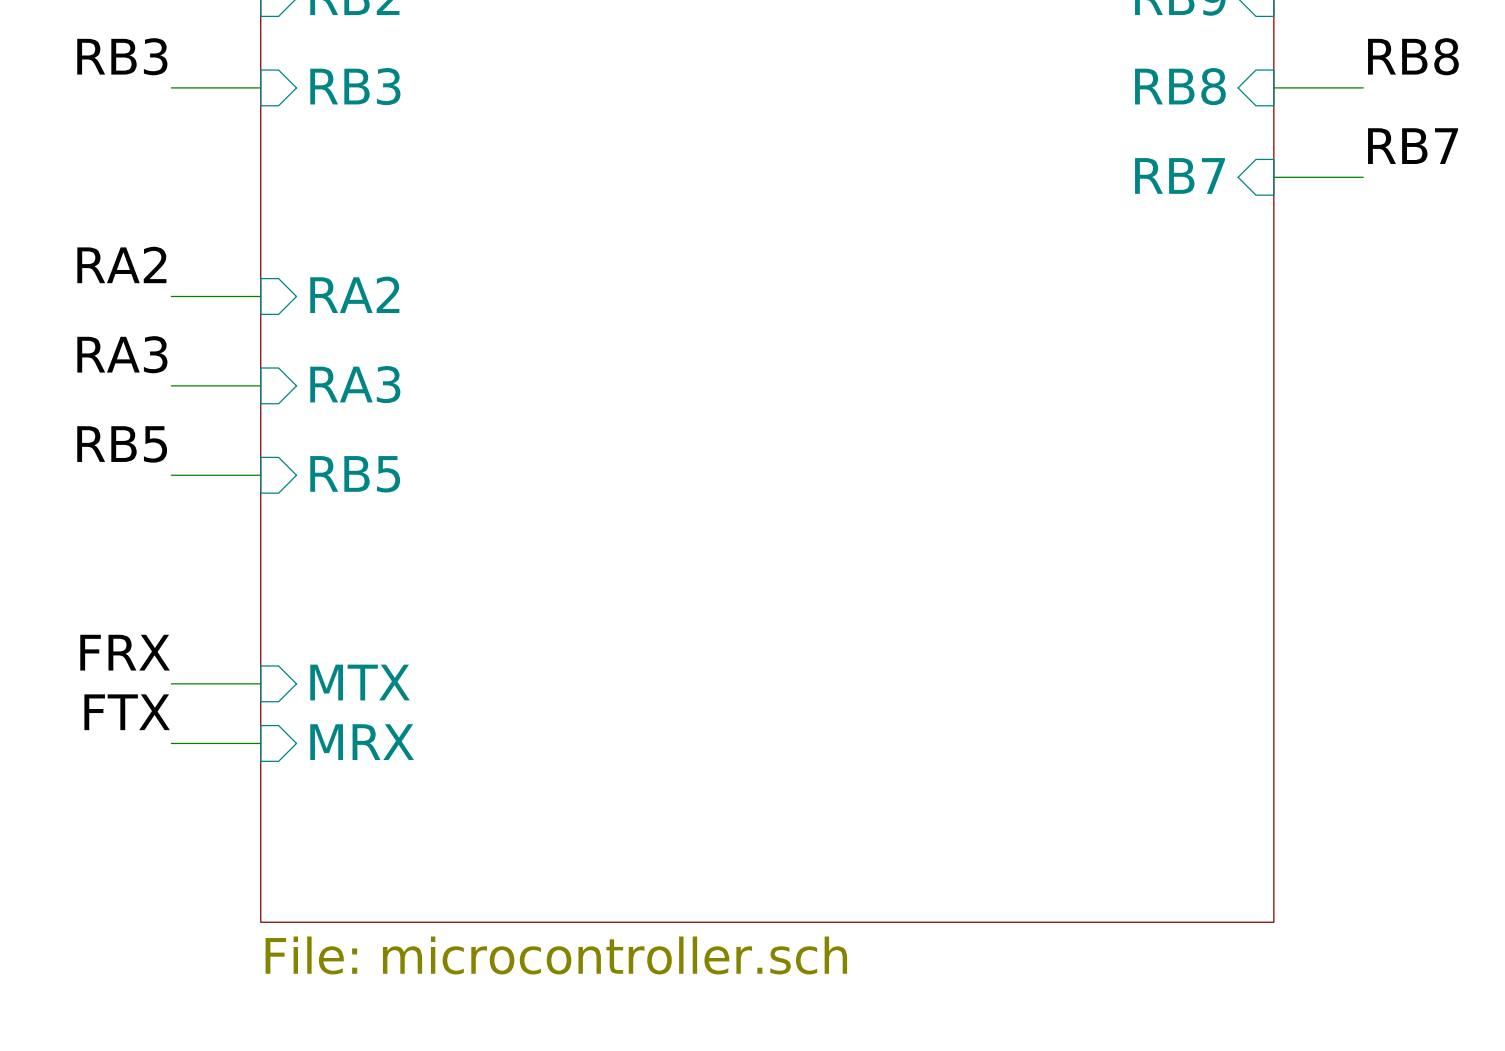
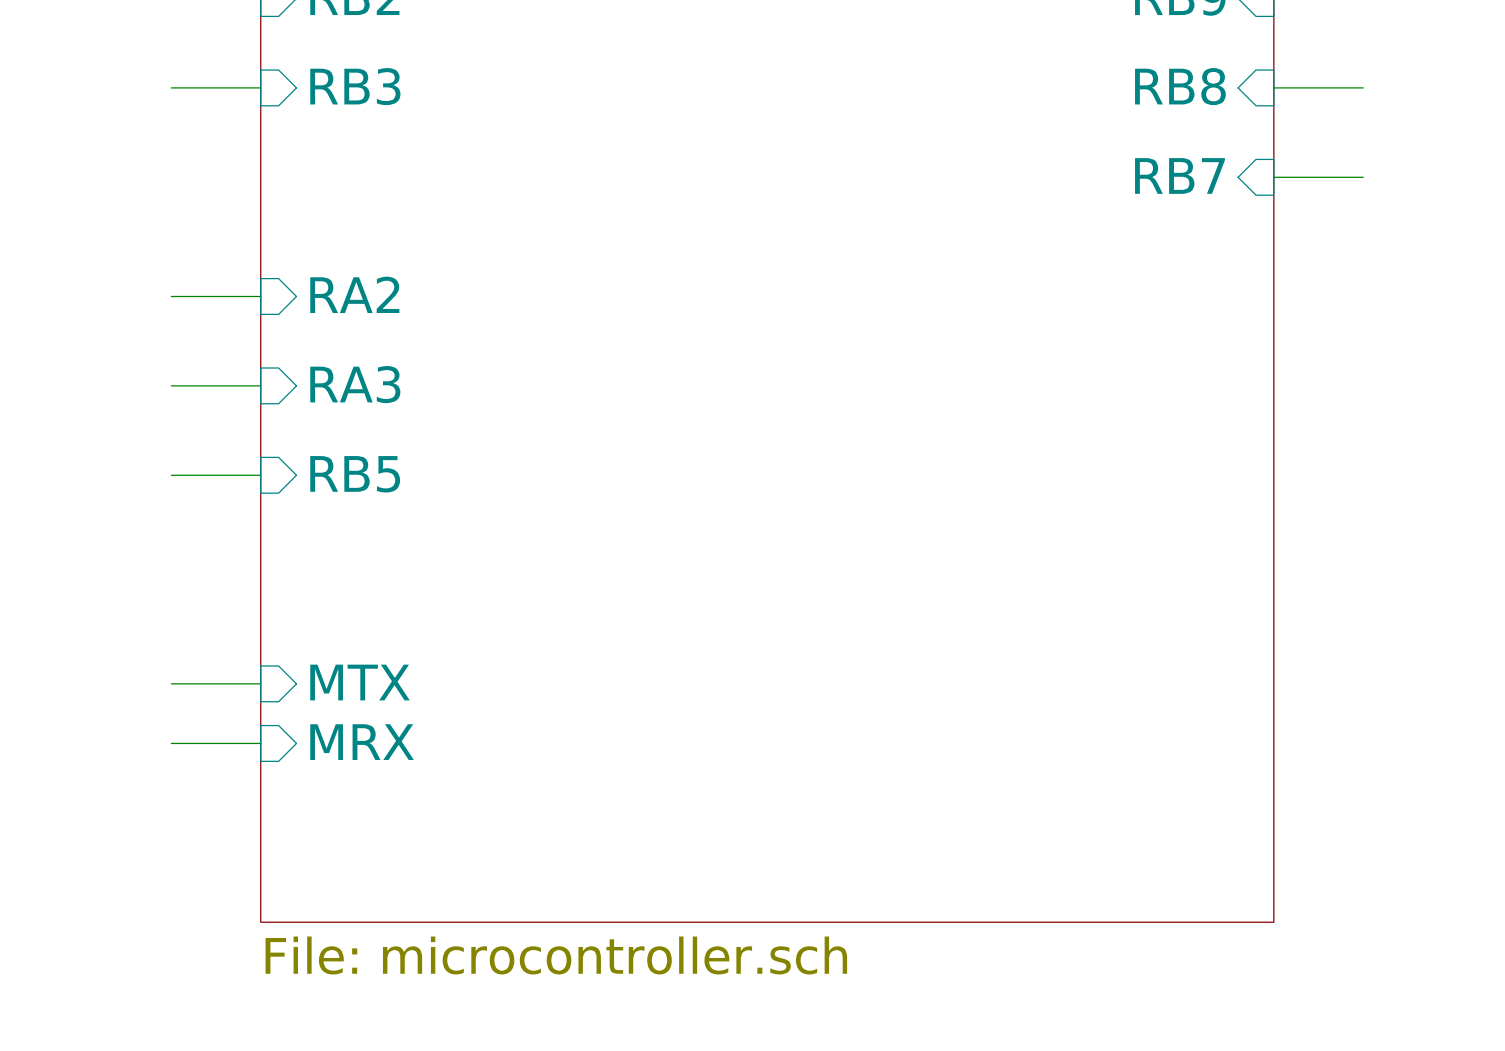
label: RB3 (122, 56) -> none
label: RB8 (1413, 56) -> none
label: RB7 (1413, 146) -> none
label: RA2 (121, 264) -> none
label: RA3 (122, 354) -> none
label: RB5 (122, 444) -> none
label: FRX (125, 652) -> none
label: FTX (127, 712) -> none

